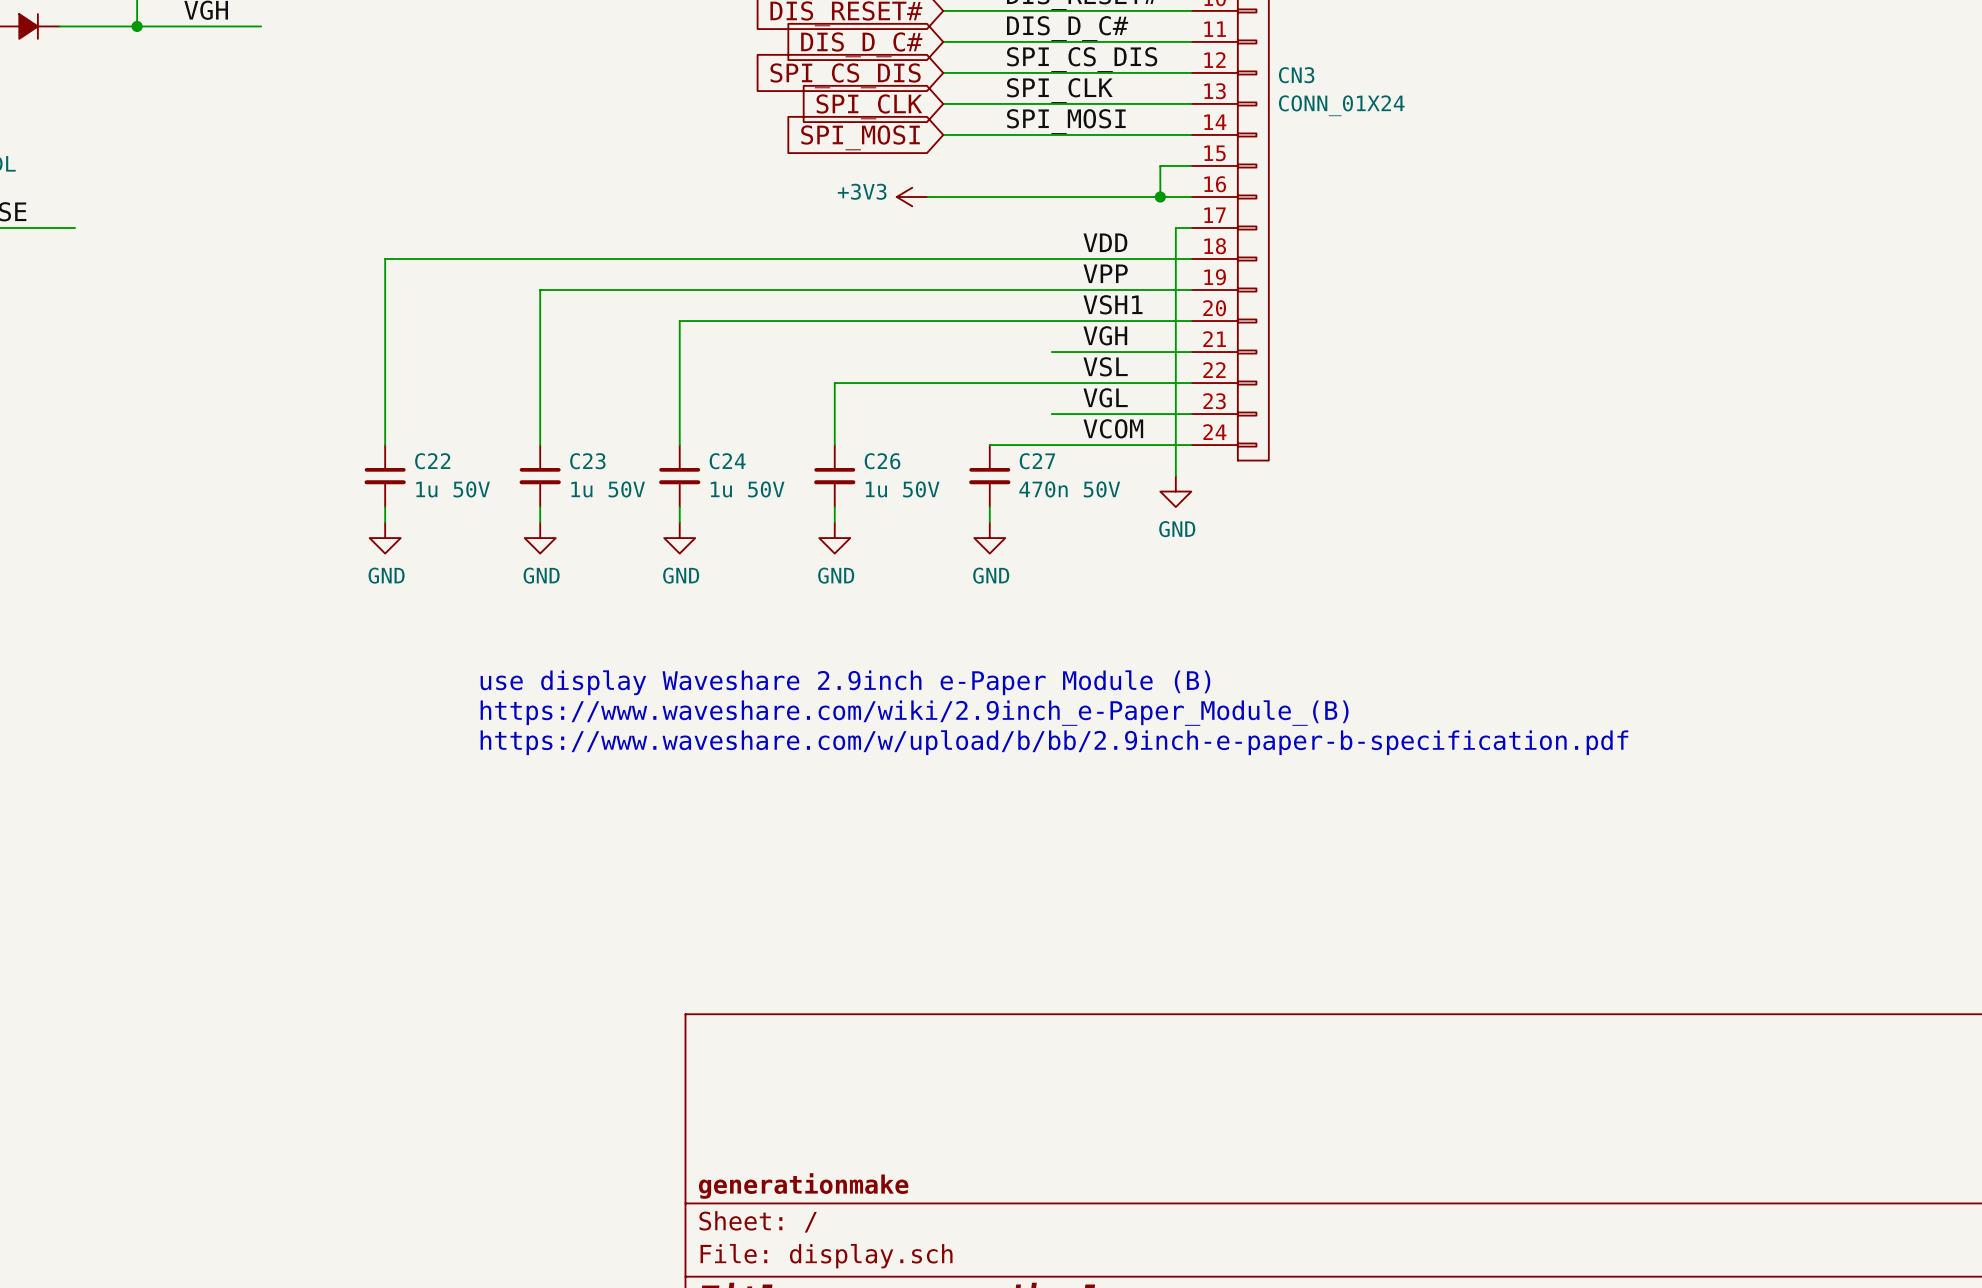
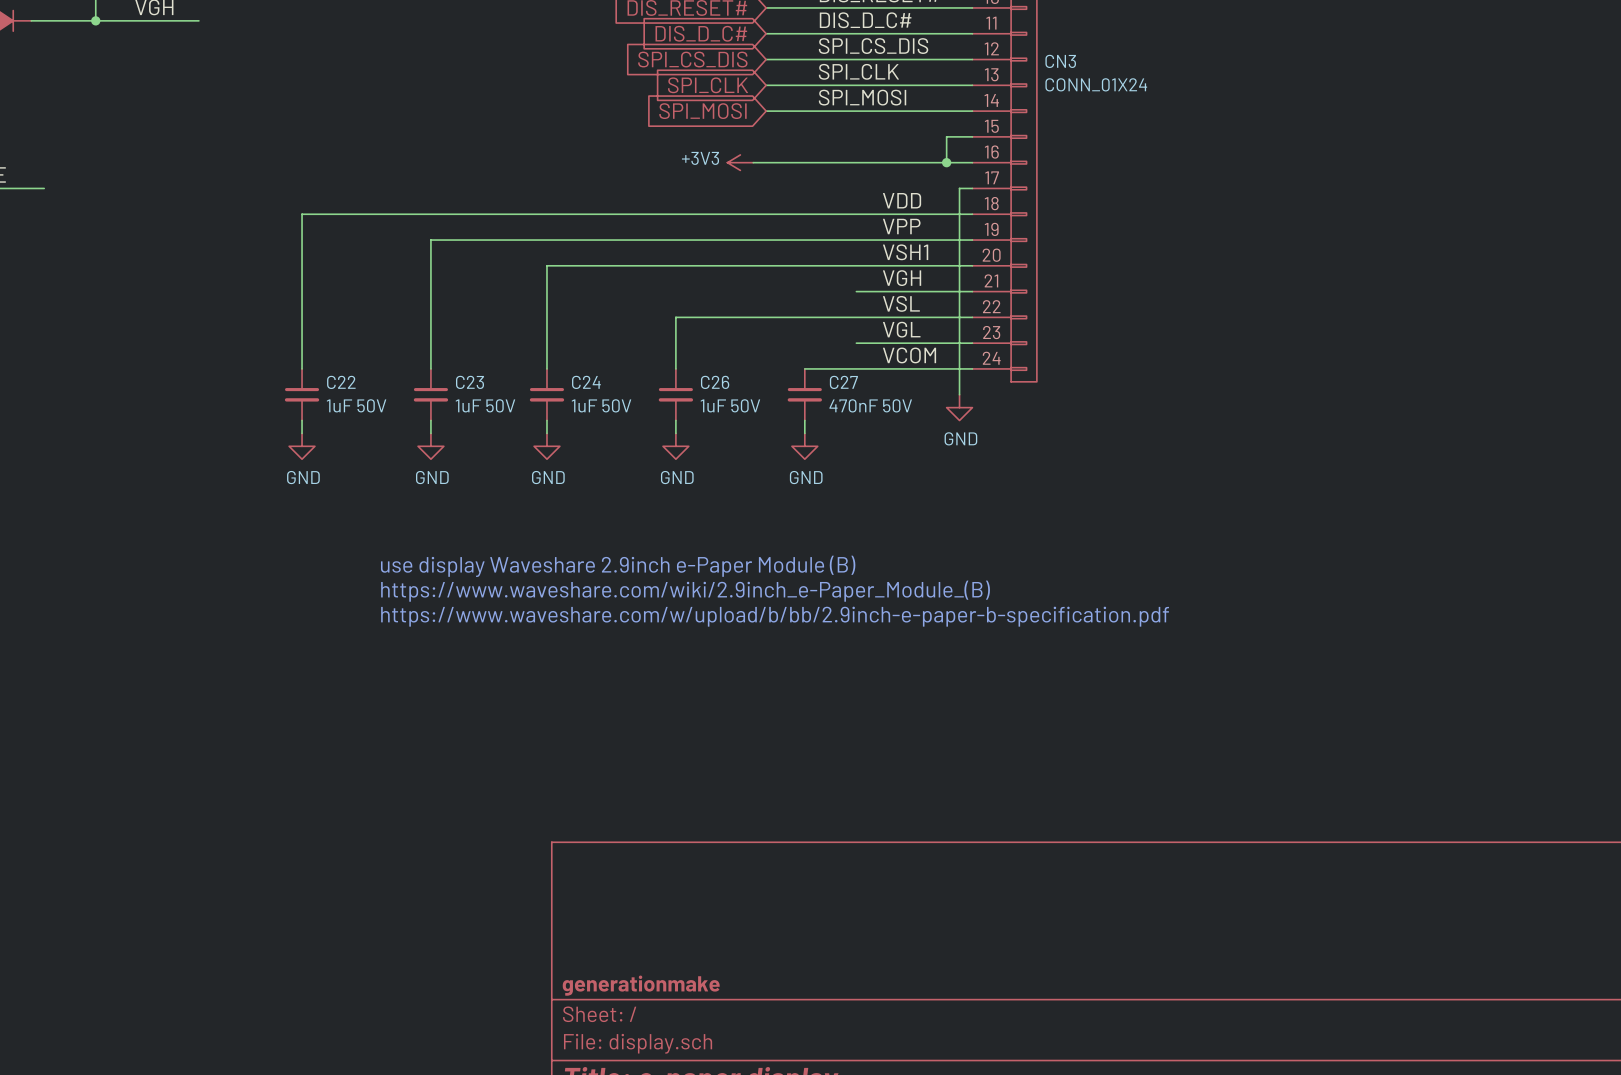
C22 value: 1u 50V (453, 489) -> 1uF 50V (356, 405)
C23 value: 1u 50V (608, 489) -> 1uF 50V (485, 405)
C24 value: 1u 50V (747, 489) -> 1uF 50V (601, 405)
C26 value: 1u 50V (902, 489) -> 1uF 50V (730, 405)
C27 value: 470n 50V (1069, 489) -> 470nF 50V (870, 405)

